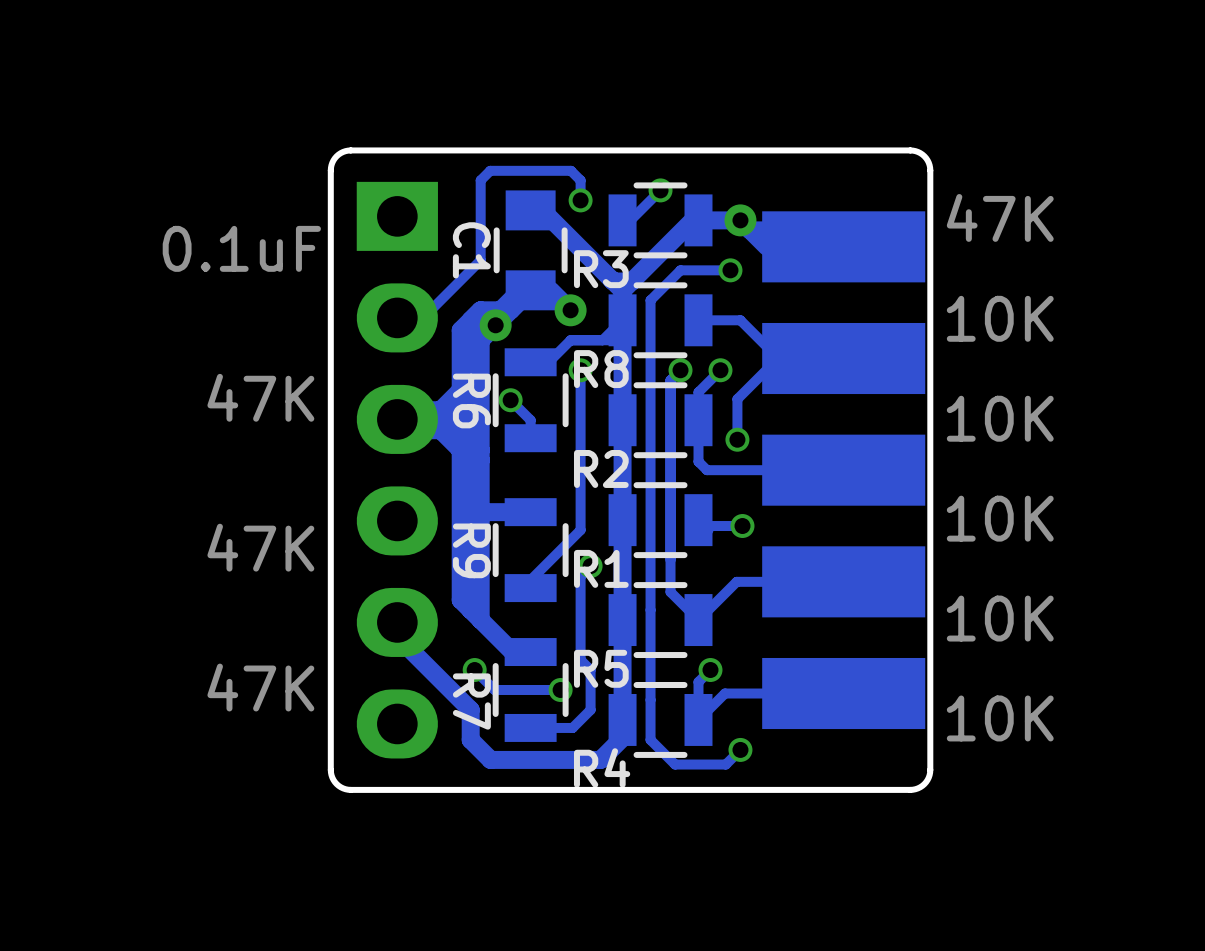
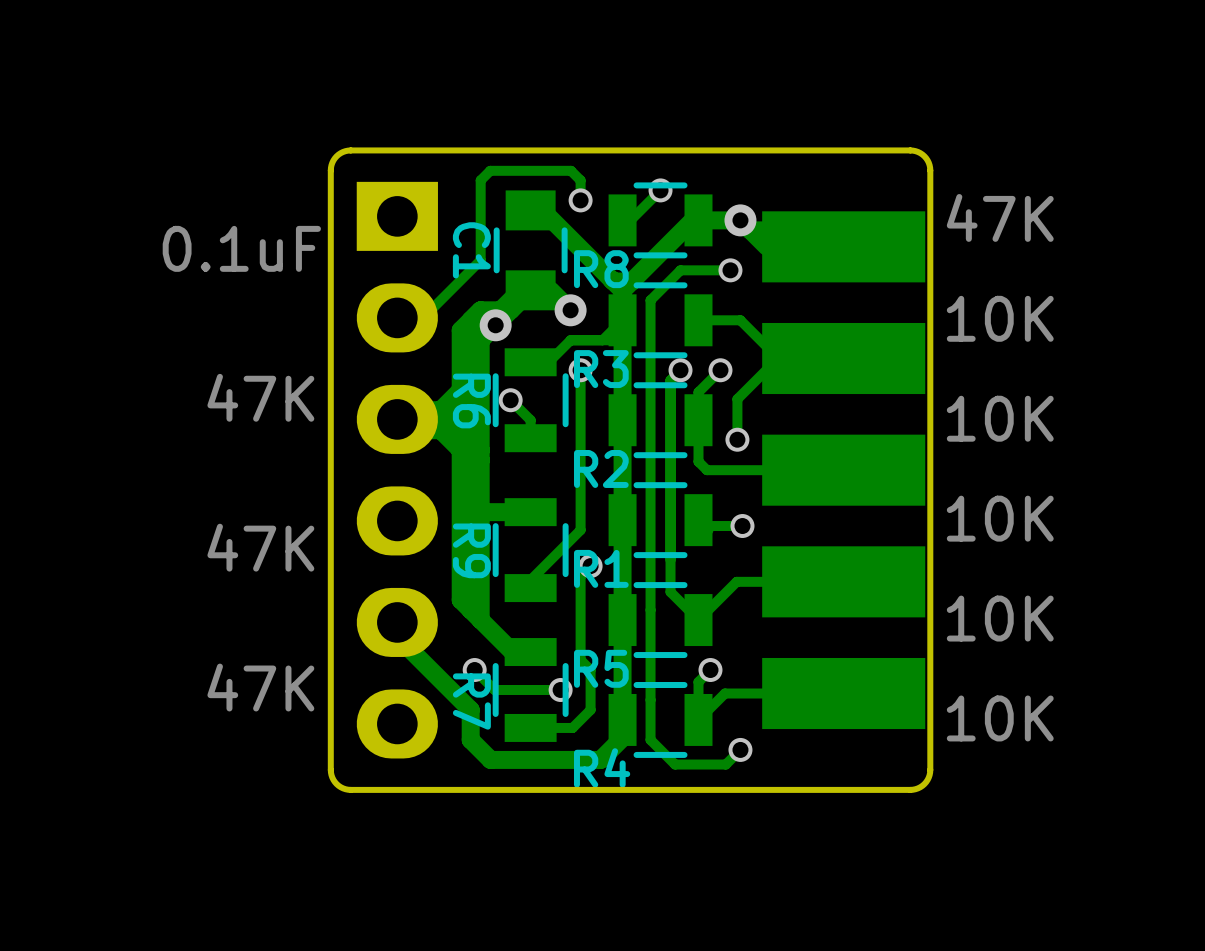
R3 name position: R3 (601, 269) -> R3 (601, 369)
R8 name position: R8 (601, 369) -> R8 (601, 269)

